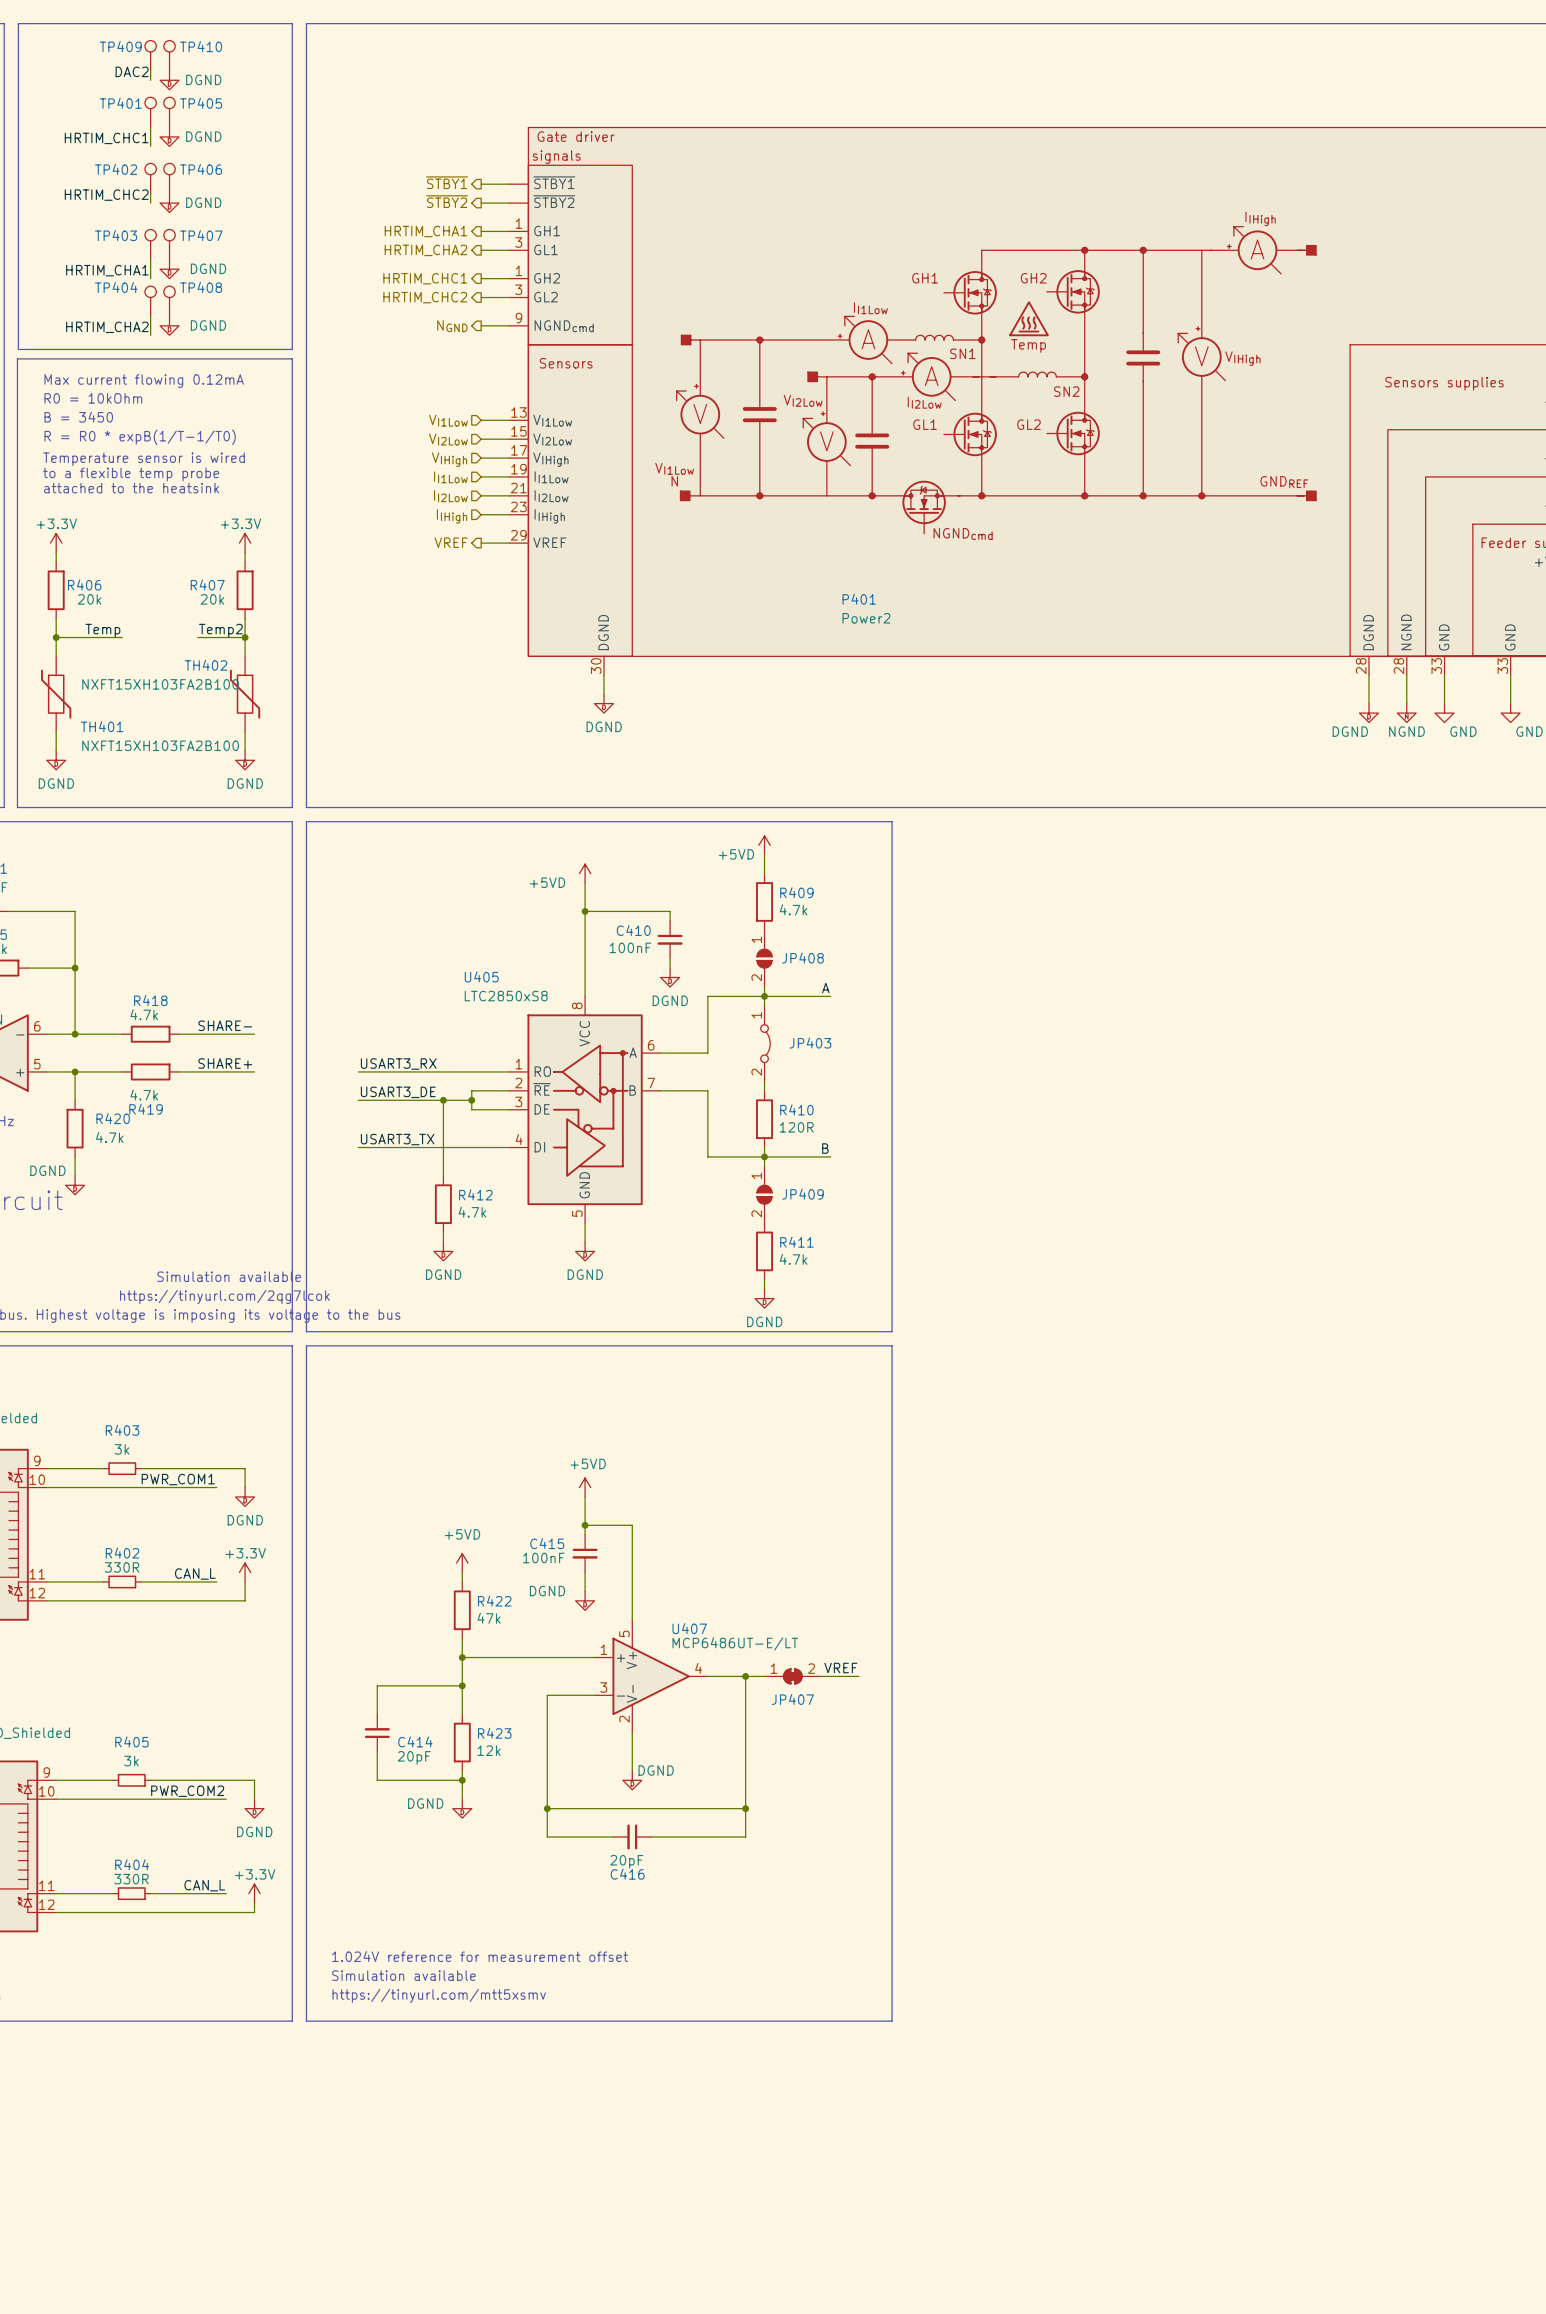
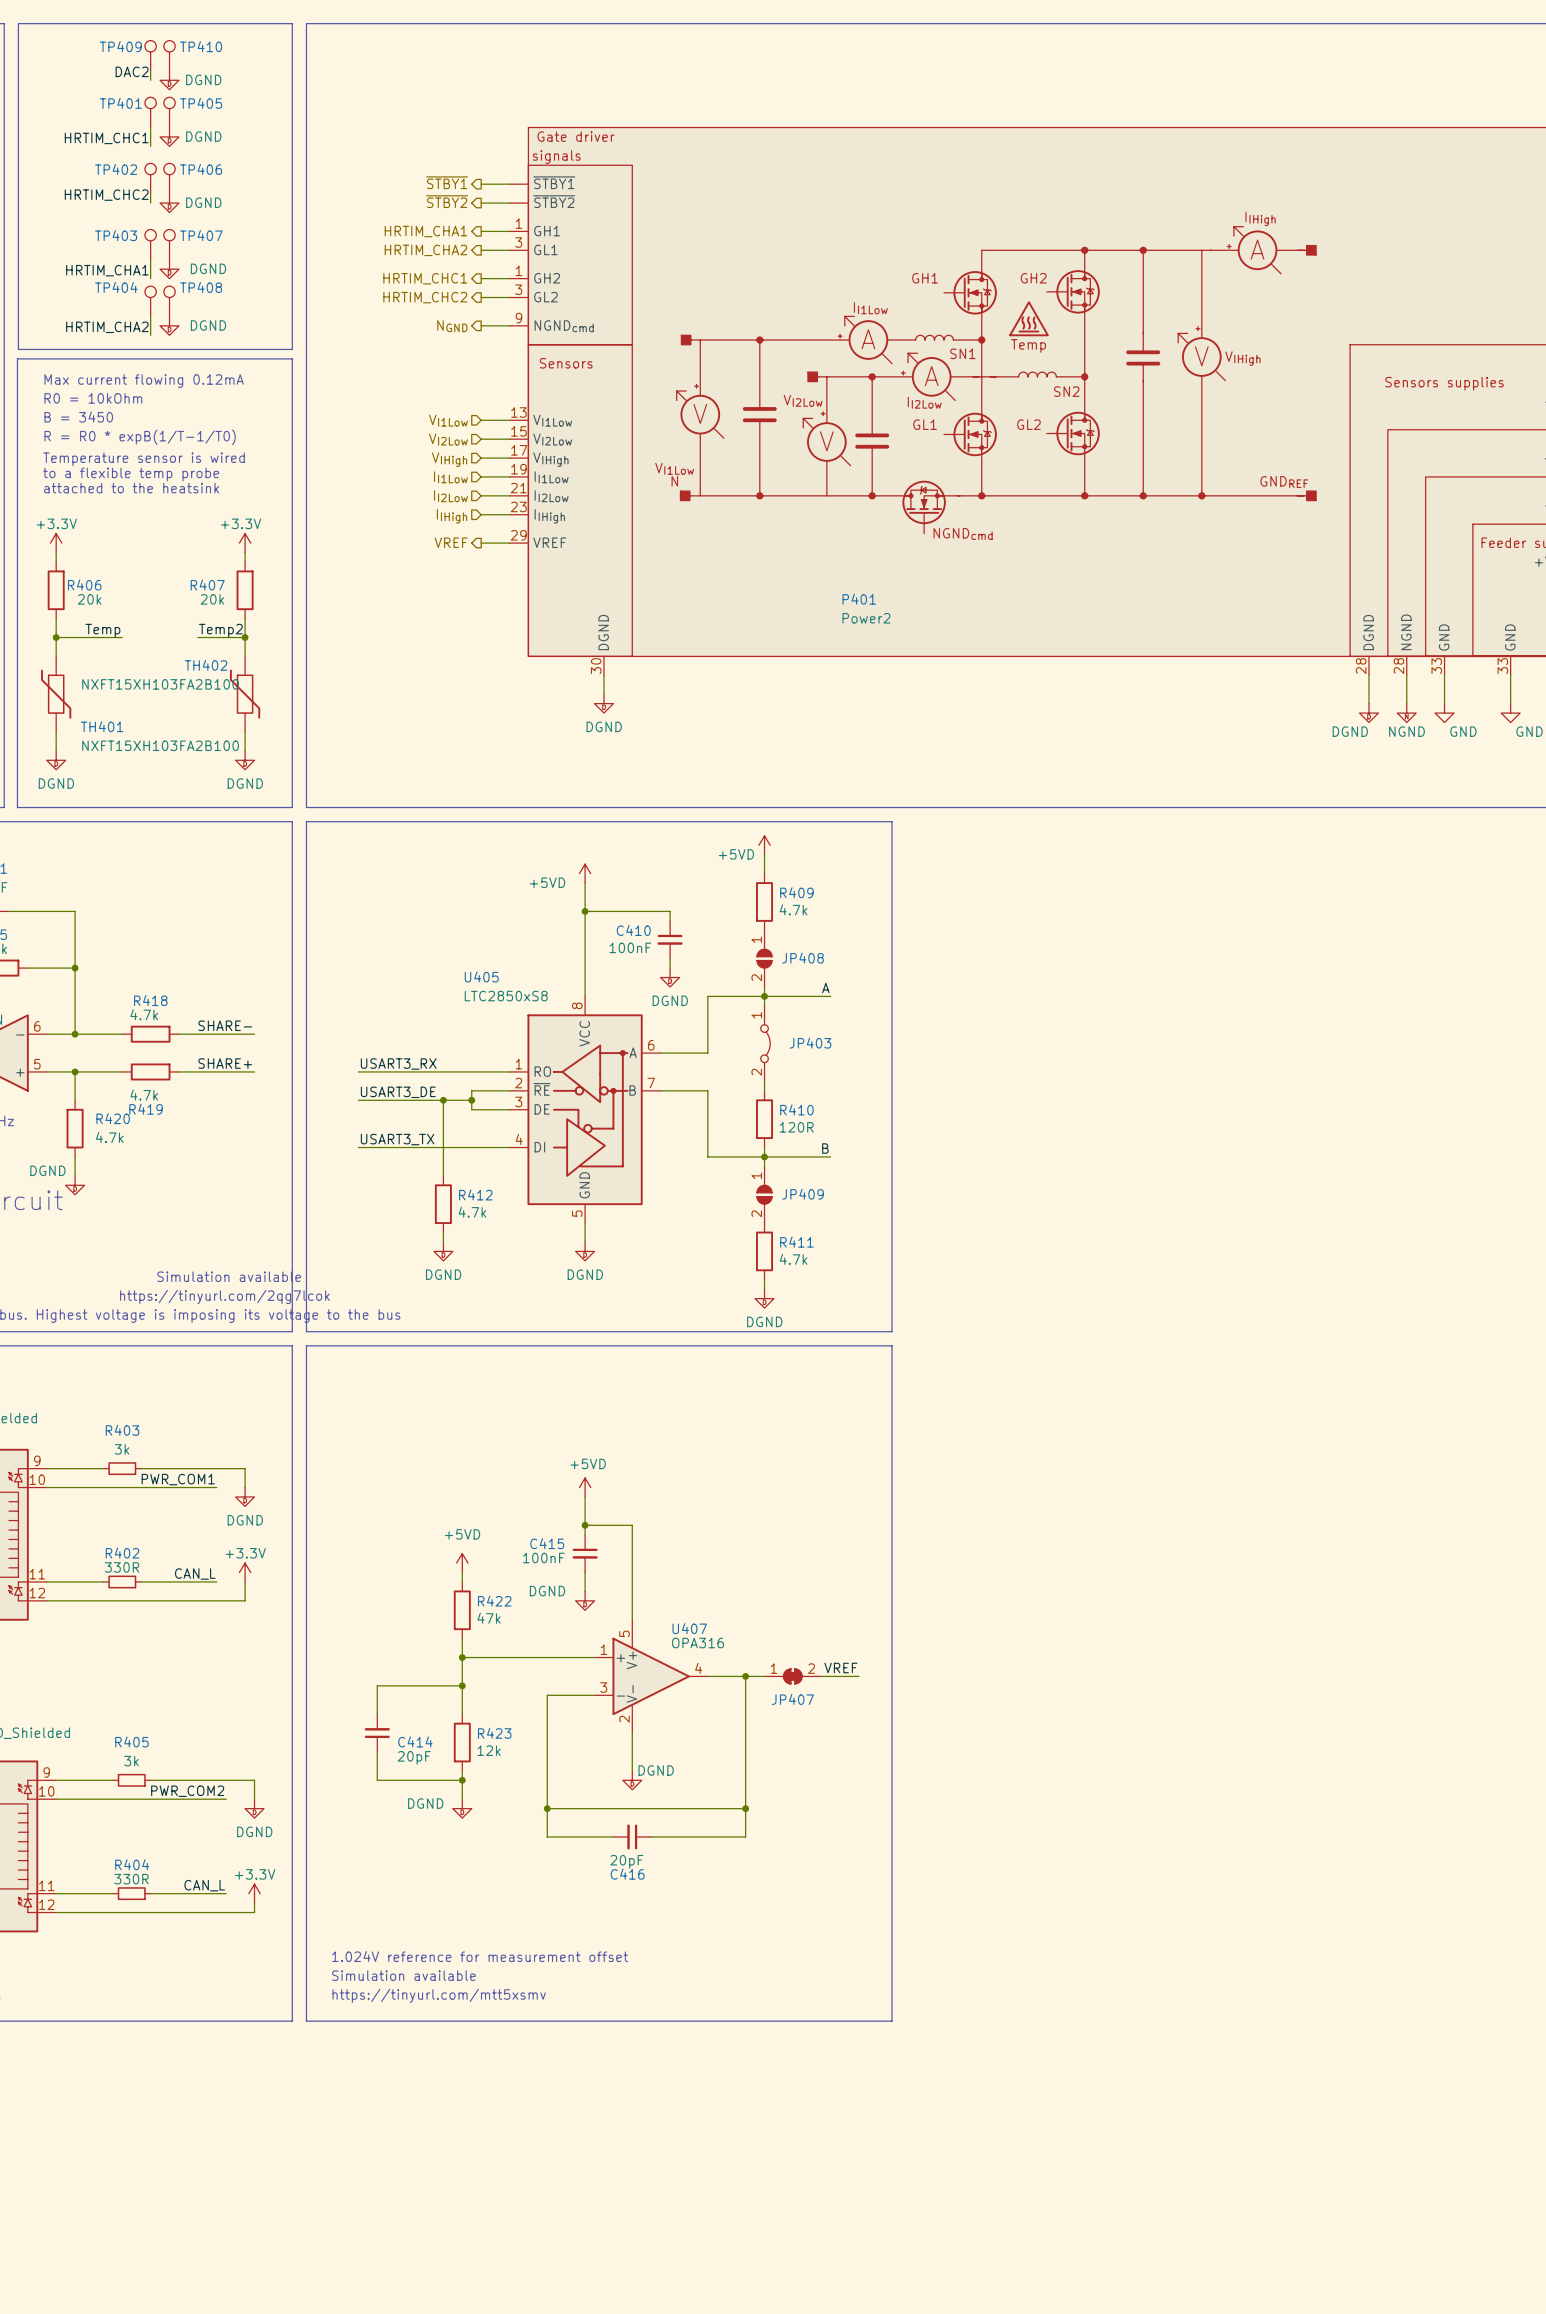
U407 value: MCP6486UT-E/LT (735, 1643) -> OPA316 (698, 1643)

